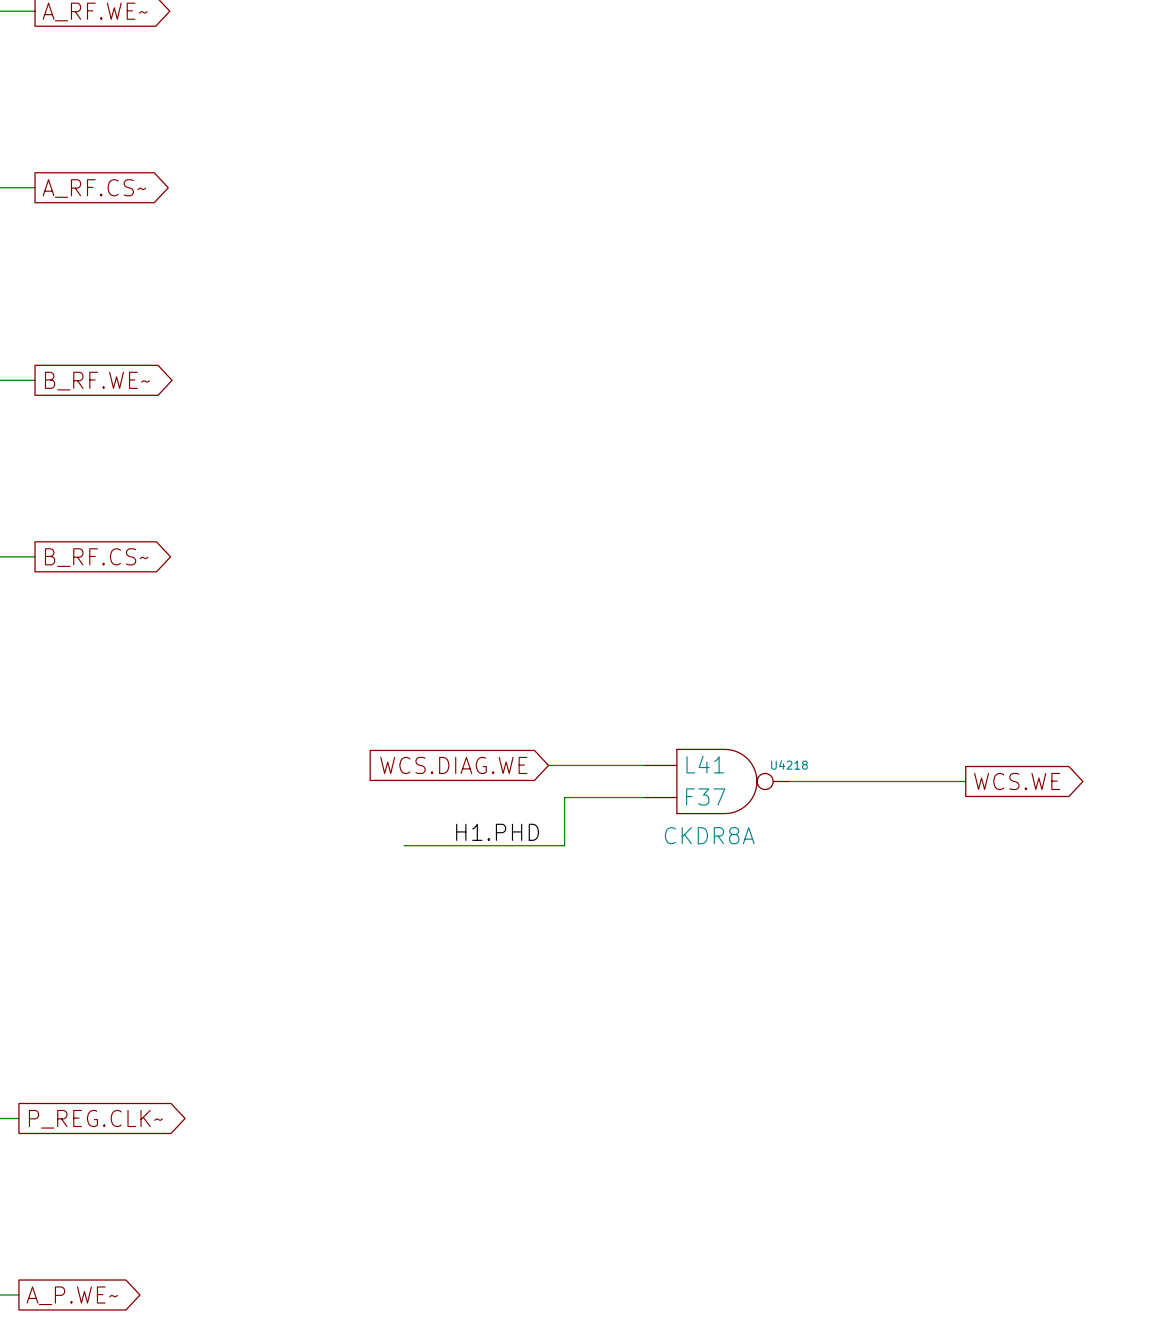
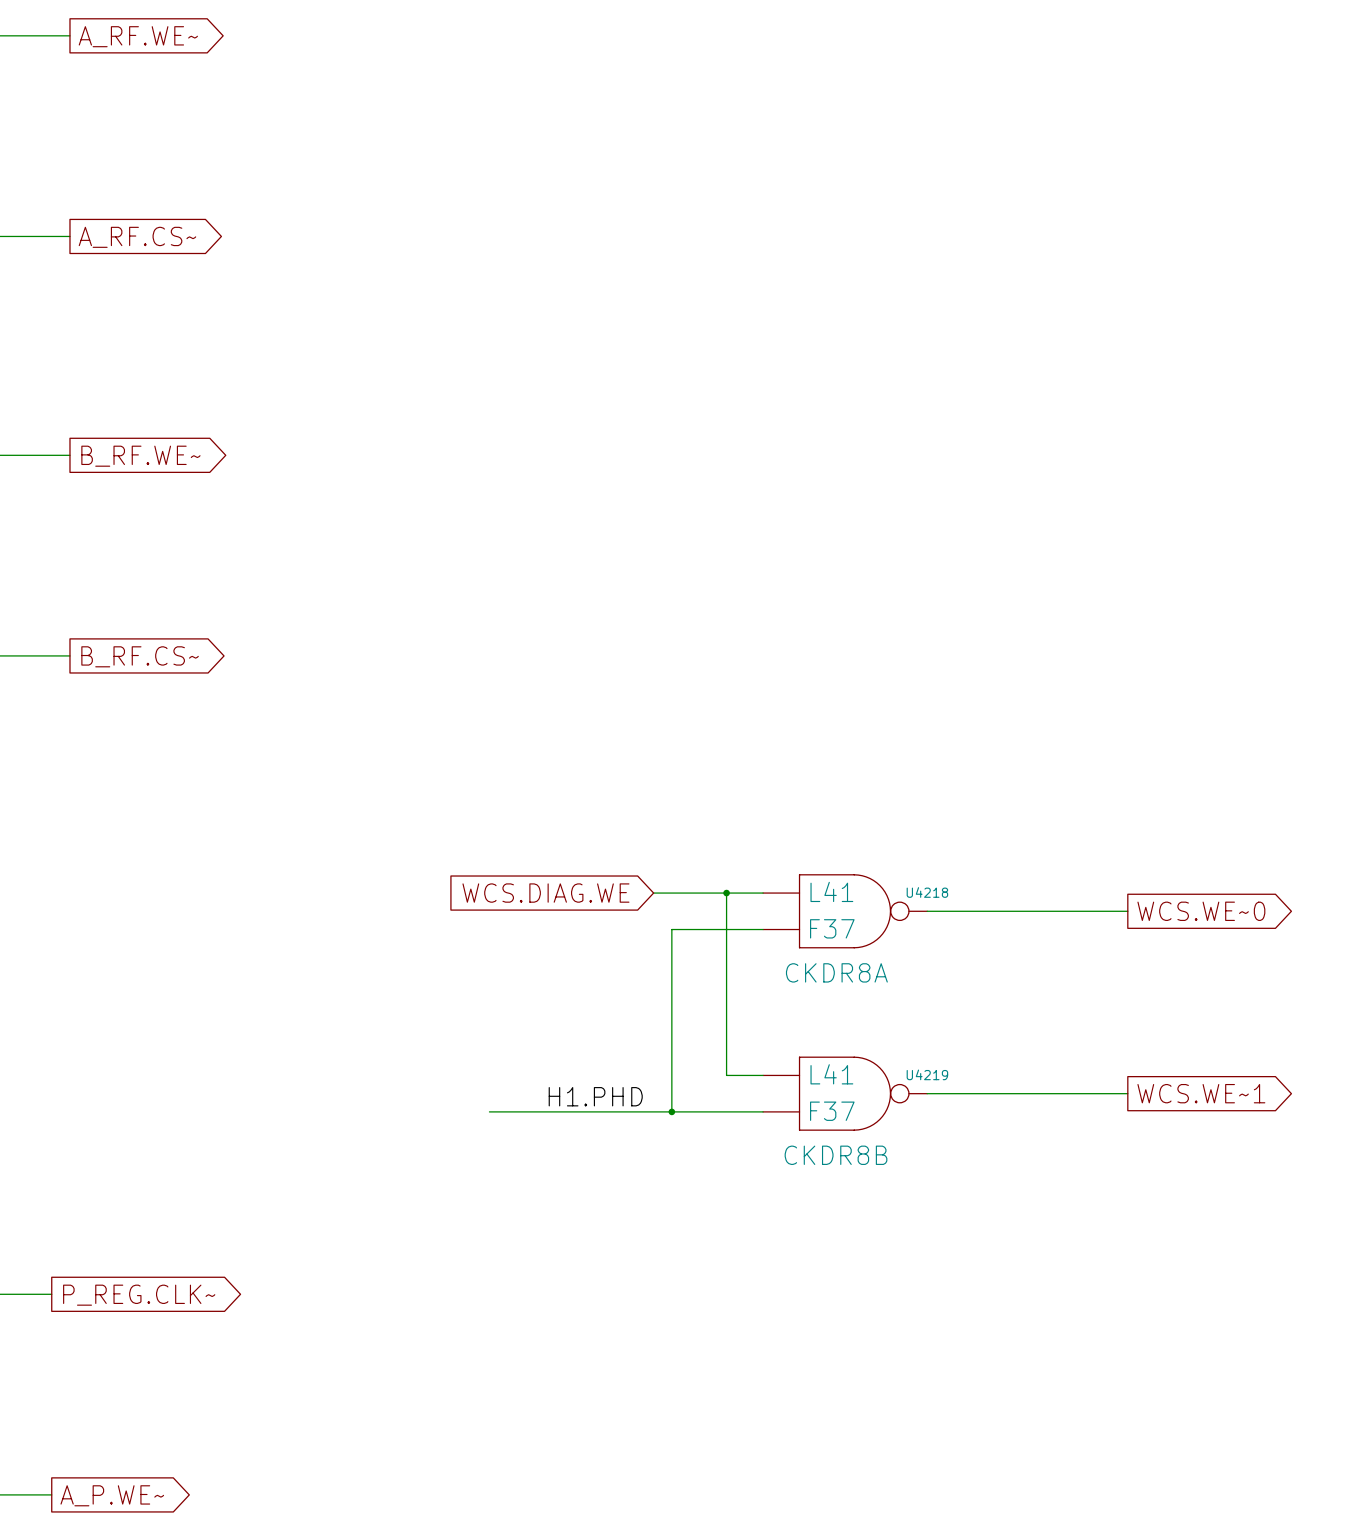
wire: none -> (726, 893) (726, 1075) (763, 1075)
junction: none -> (726, 893)
global label: WCS.WE (1017, 781) -> WCS.WE~0 (1201, 911)
label position: H1.PHD (497, 832) -> H1.PHD (595, 1096)
wire: (404, 845) (564, 845) -> (671, 1111) (671, 984)
U4219: none -> F37 (845, 1093)
wire: none -> (927, 1093) (1127, 1093)
global label: none -> WCS.WE~1 (1201, 1093)
wire: none -> (489, 1111) (763, 1111)
junction: none -> (671, 1111)

